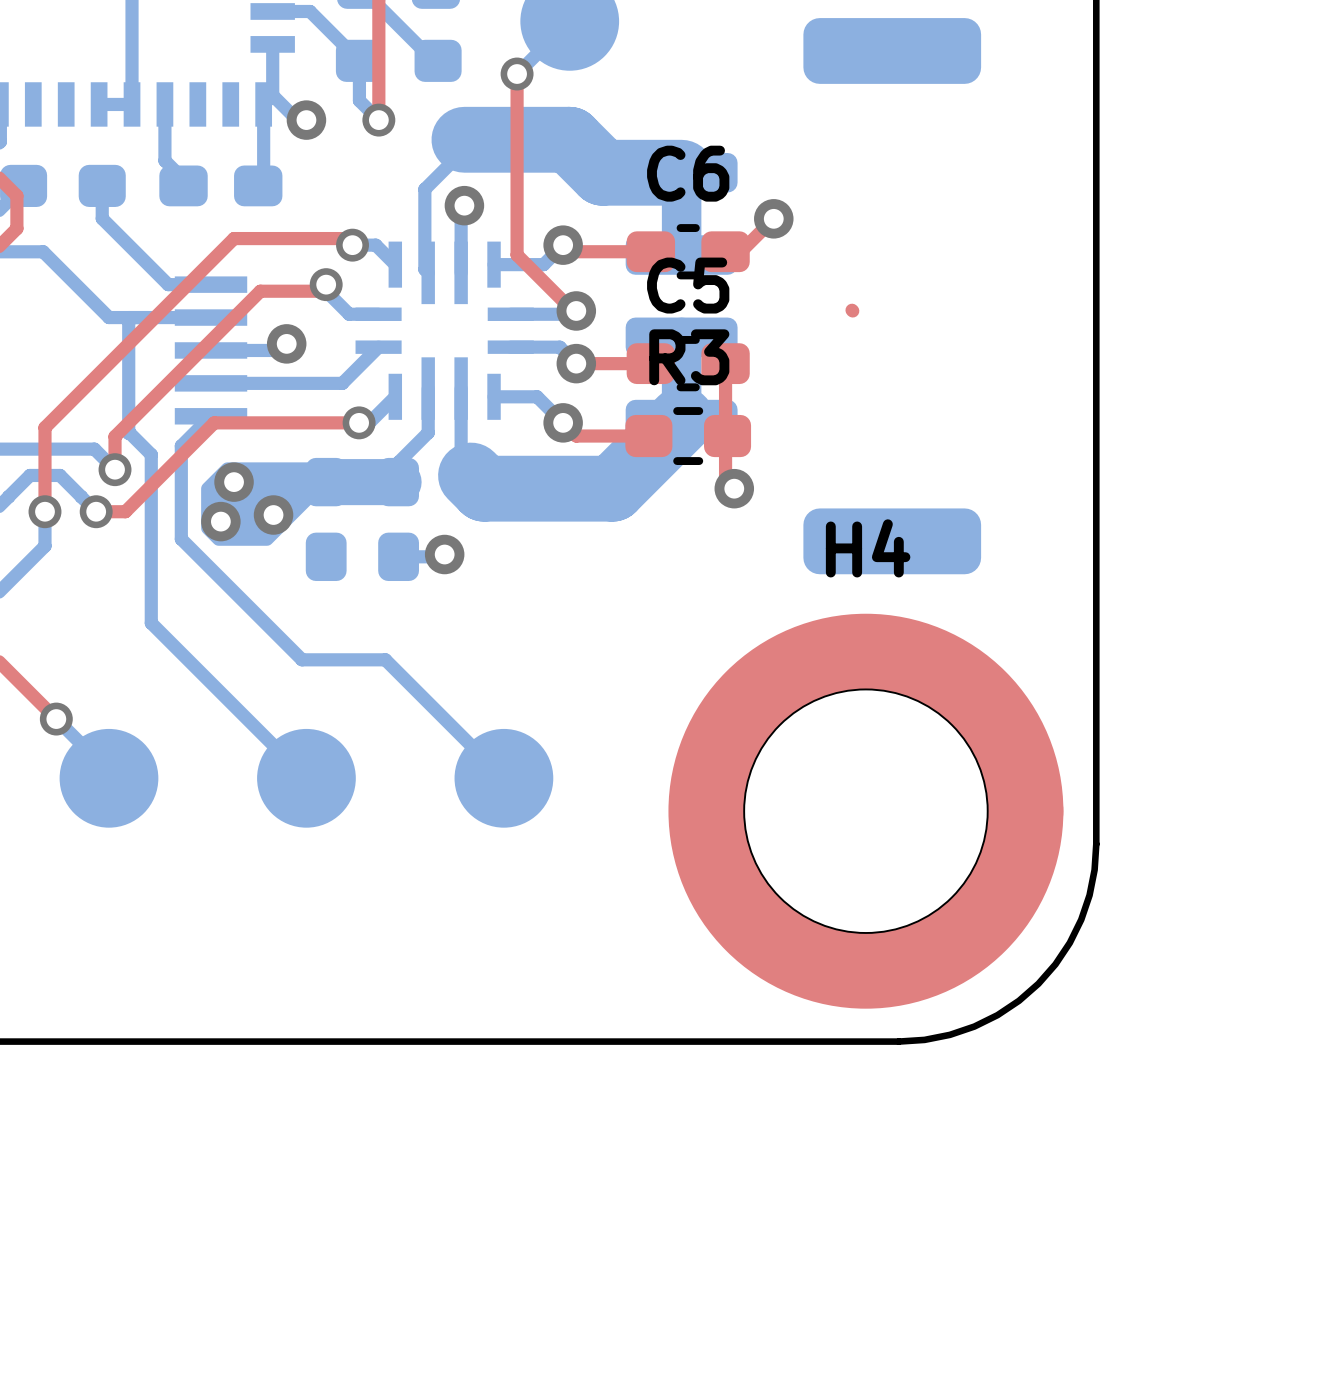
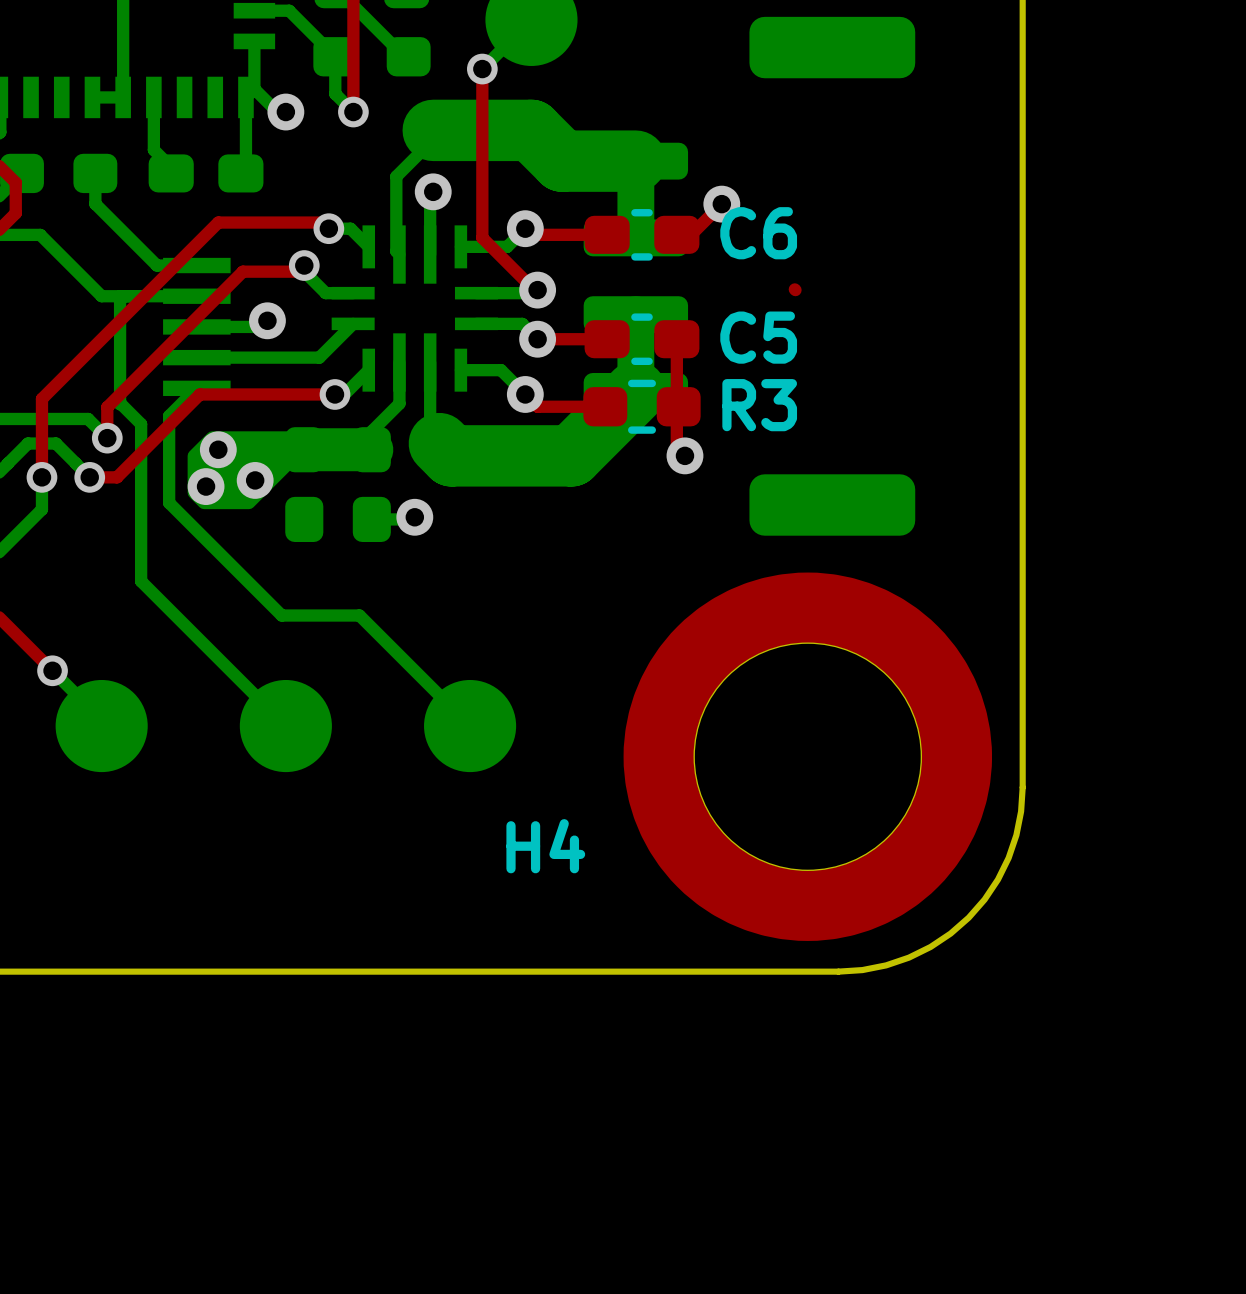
C6 name position: C6 (688, 173) -> C6 (758, 233)
C5 name position: C5 (688, 285) -> C5 (758, 337)
R3 name position: R3 (689, 357) -> R3 (759, 405)
H4 name position: H4 (868, 548) -> H4 (545, 846)

